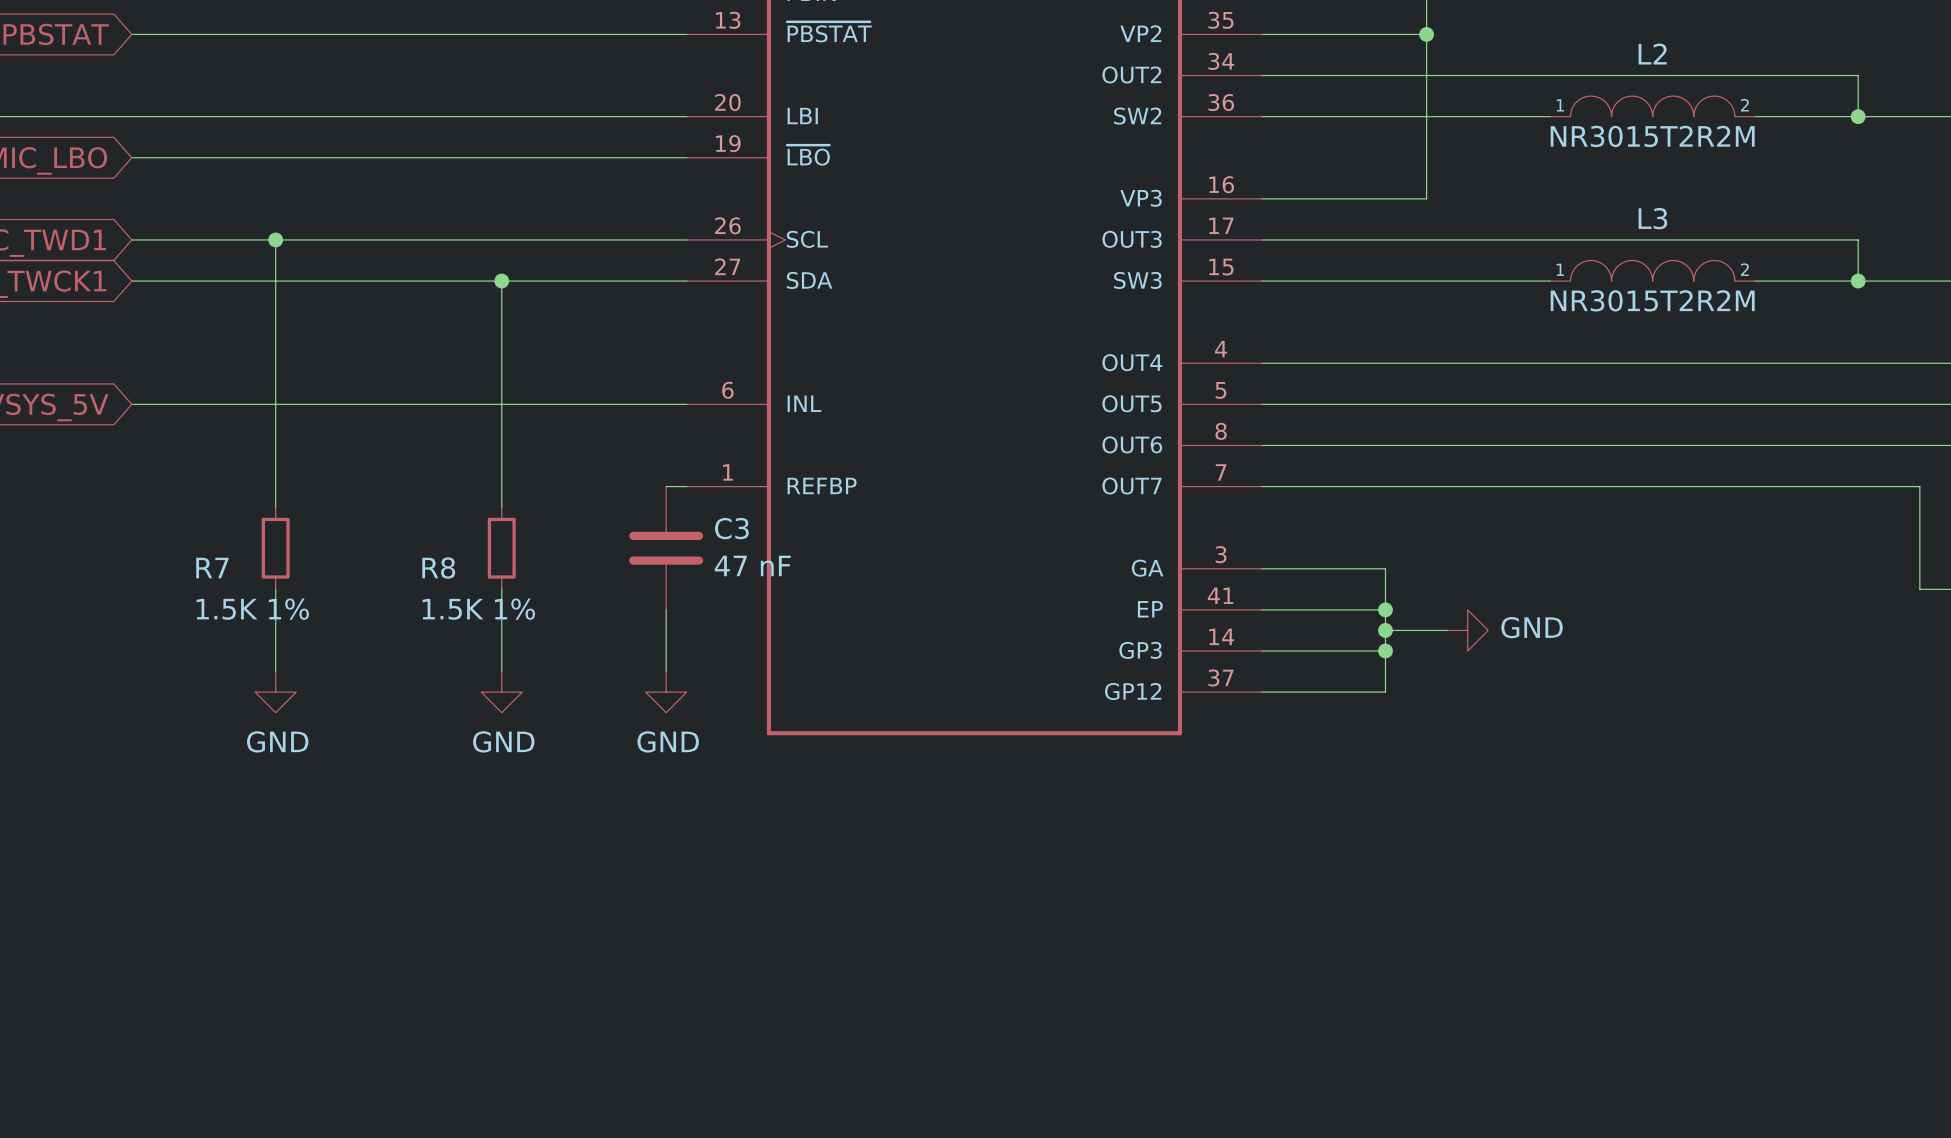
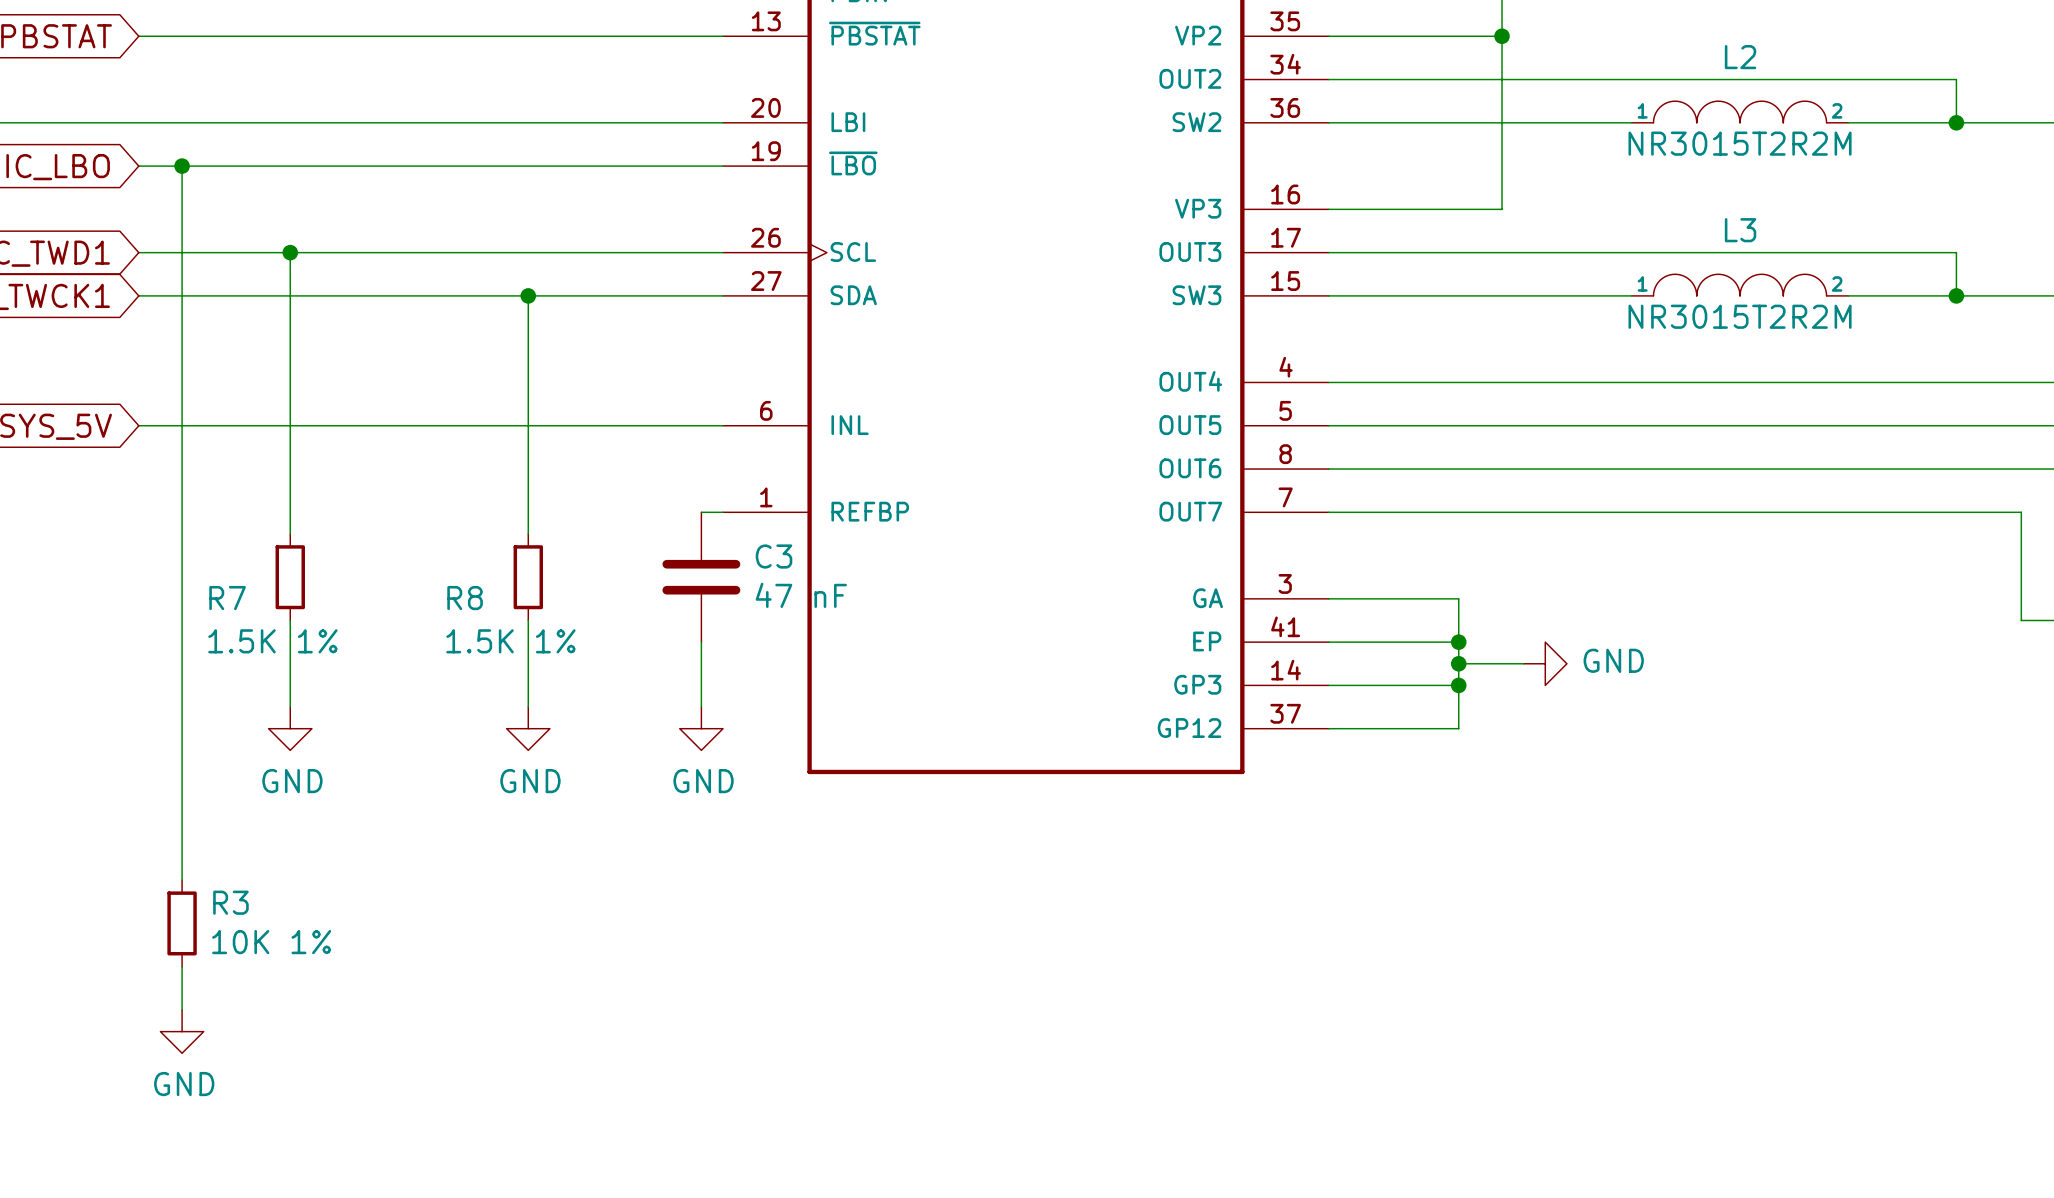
wire: none -> (182, 166) (182, 880)
junction: none -> (182, 166)
R3: none -> 10K 1% (182, 923)
wire: none -> (182, 966) (182, 1009)
power symbol: none -> GND (182, 1031)

